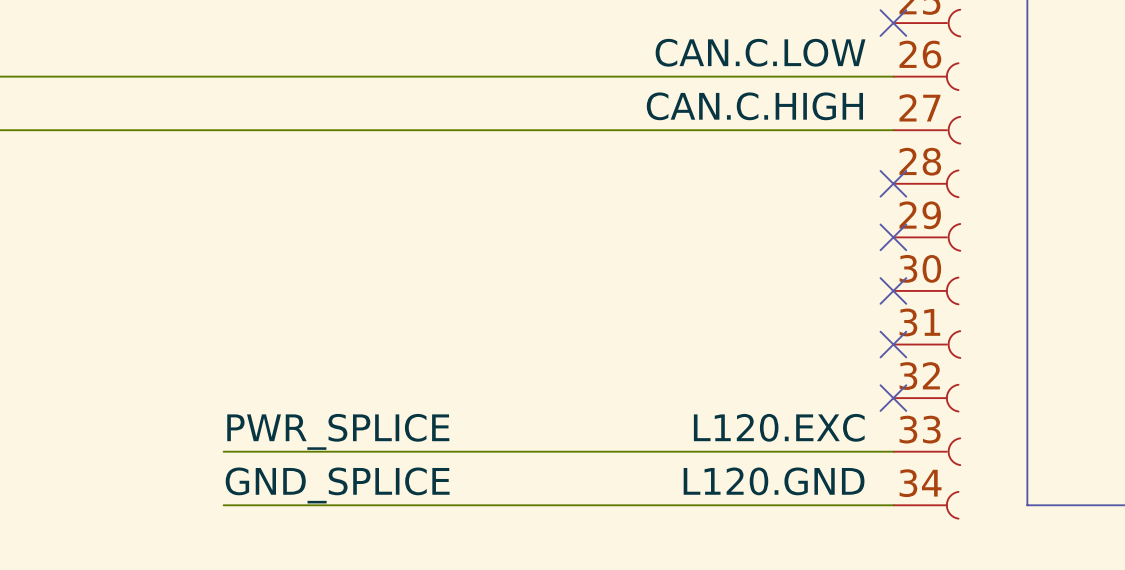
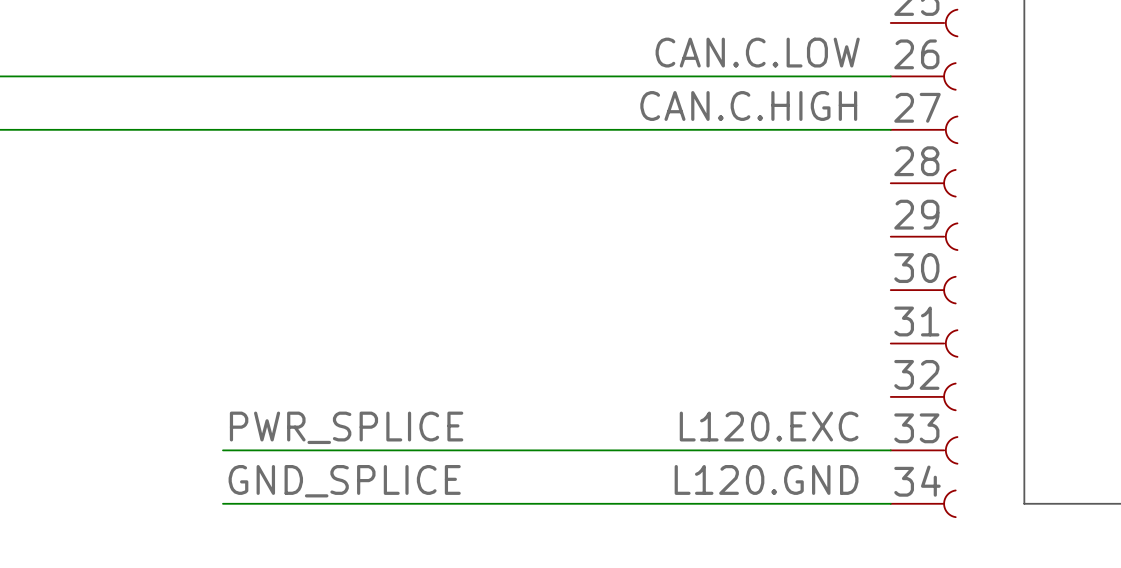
no-connect mark: (893, 23) -> none
no-connect mark: (893, 183) -> none
no-connect mark: (893, 237) -> none
no-connect mark: (893, 290) -> none
no-connect mark: (893, 344) -> none
no-connect mark: (893, 398) -> none

